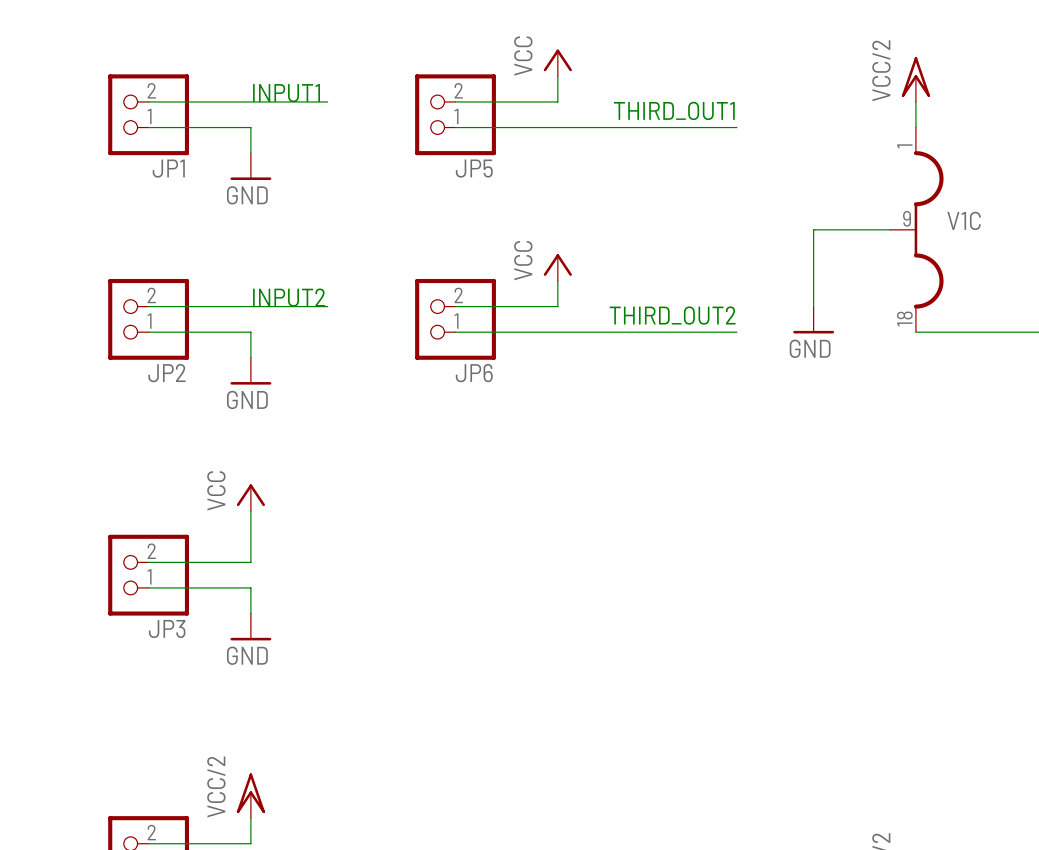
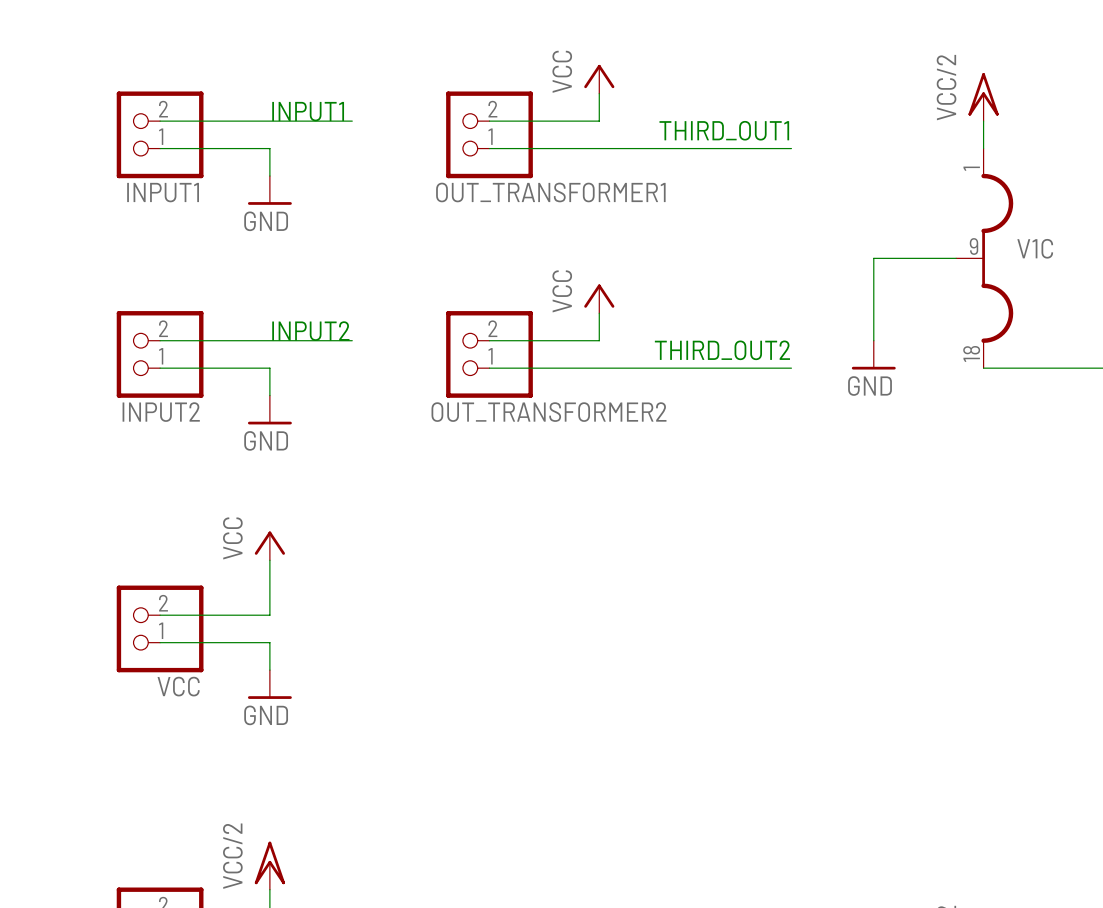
JP1 name: JP1 (168, 168) -> INPUT1 (163, 192)
JP5 name: JP5 (474, 168) -> OUT_TRANSFORMER1 (550, 192)
JP2 name: JP2 (167, 373) -> INPUT2 (161, 412)
JP6 name: JP6 (474, 373) -> OUT_TRANSFORMER2 (549, 412)
JP3 name: JP3 (167, 628) -> VCC (178, 686)

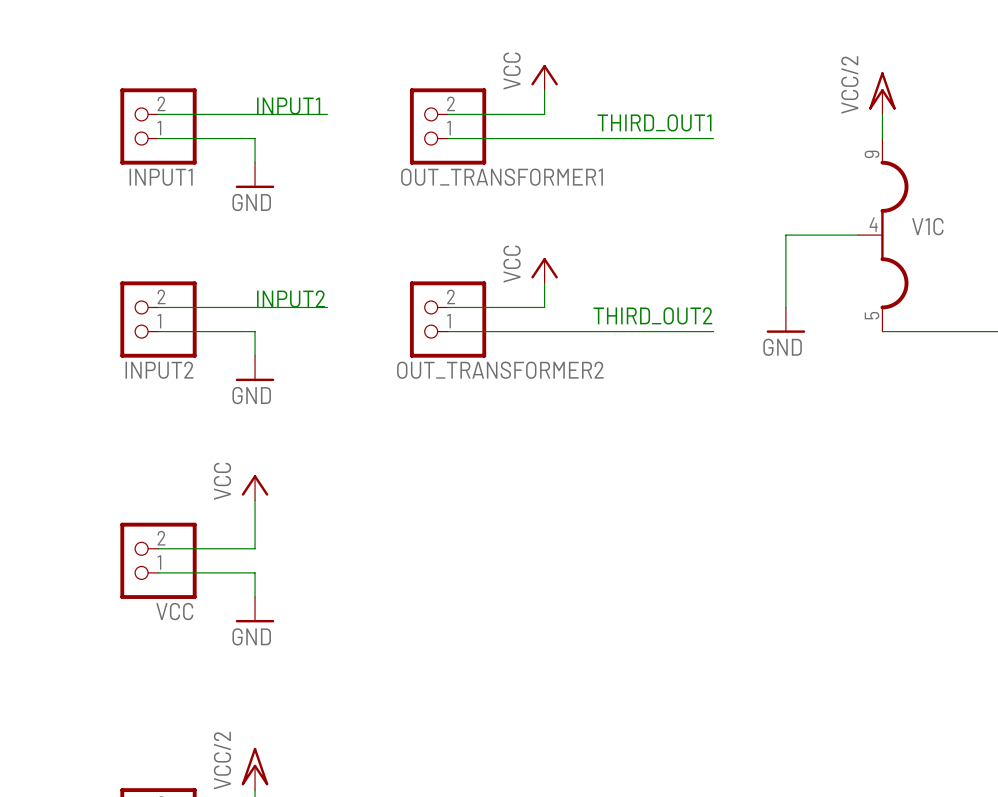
V1C pin number: 1 (971, 168) -> 9 (871, 154)
V1C pin number: 9 (973, 246) -> 4 (873, 224)
V1C pin number: 18 (971, 353) -> 5 (872, 315)

